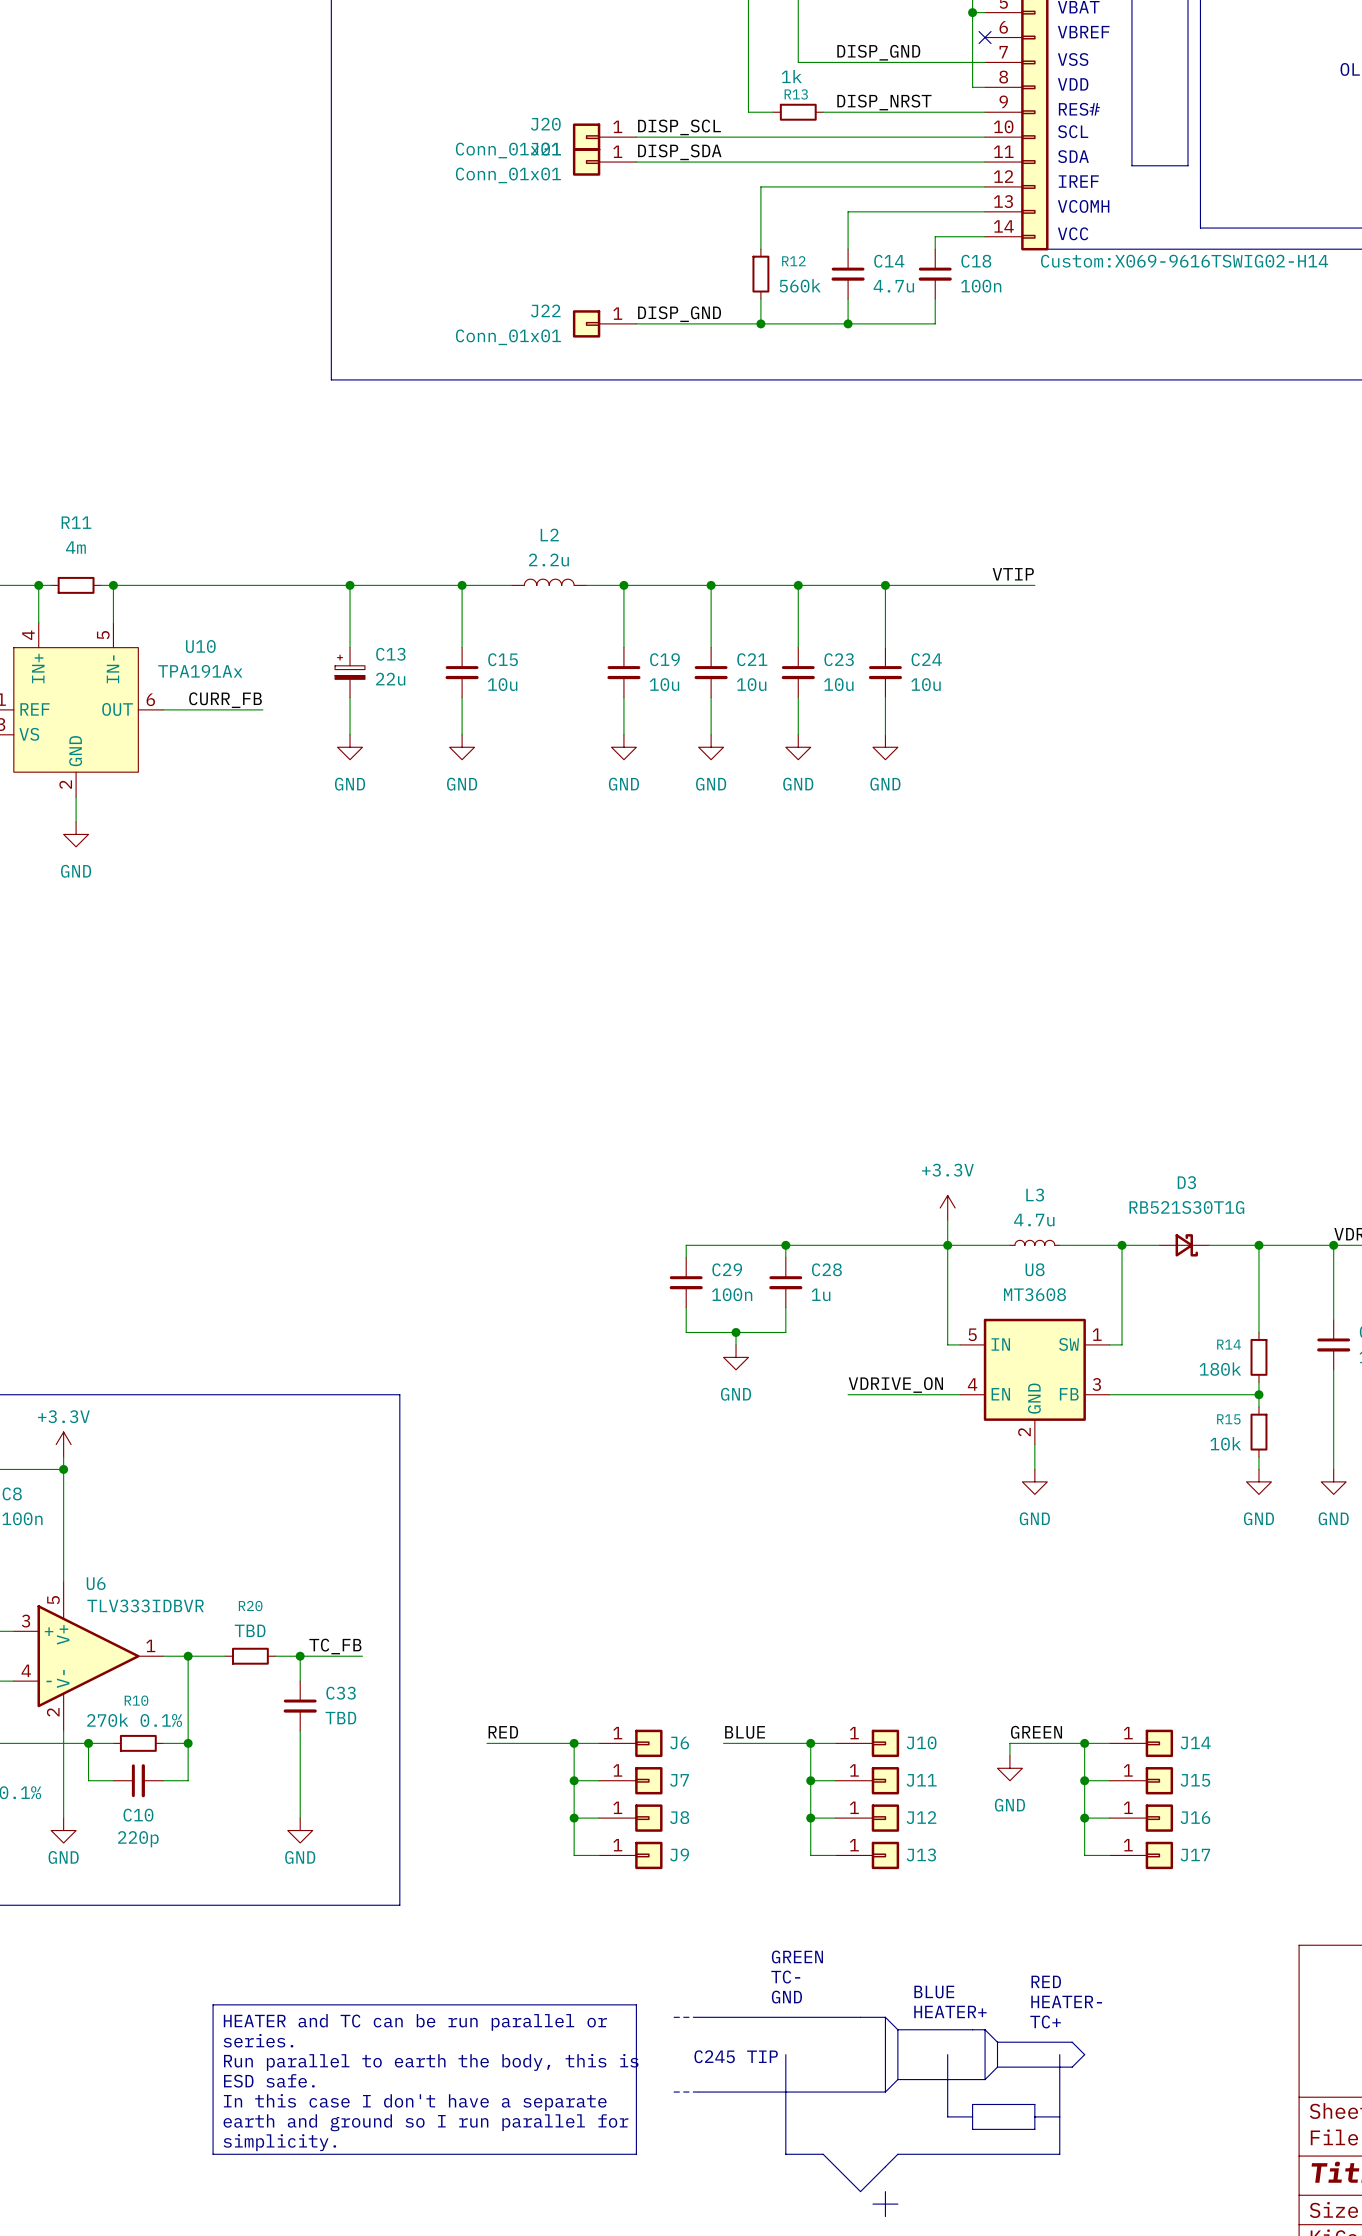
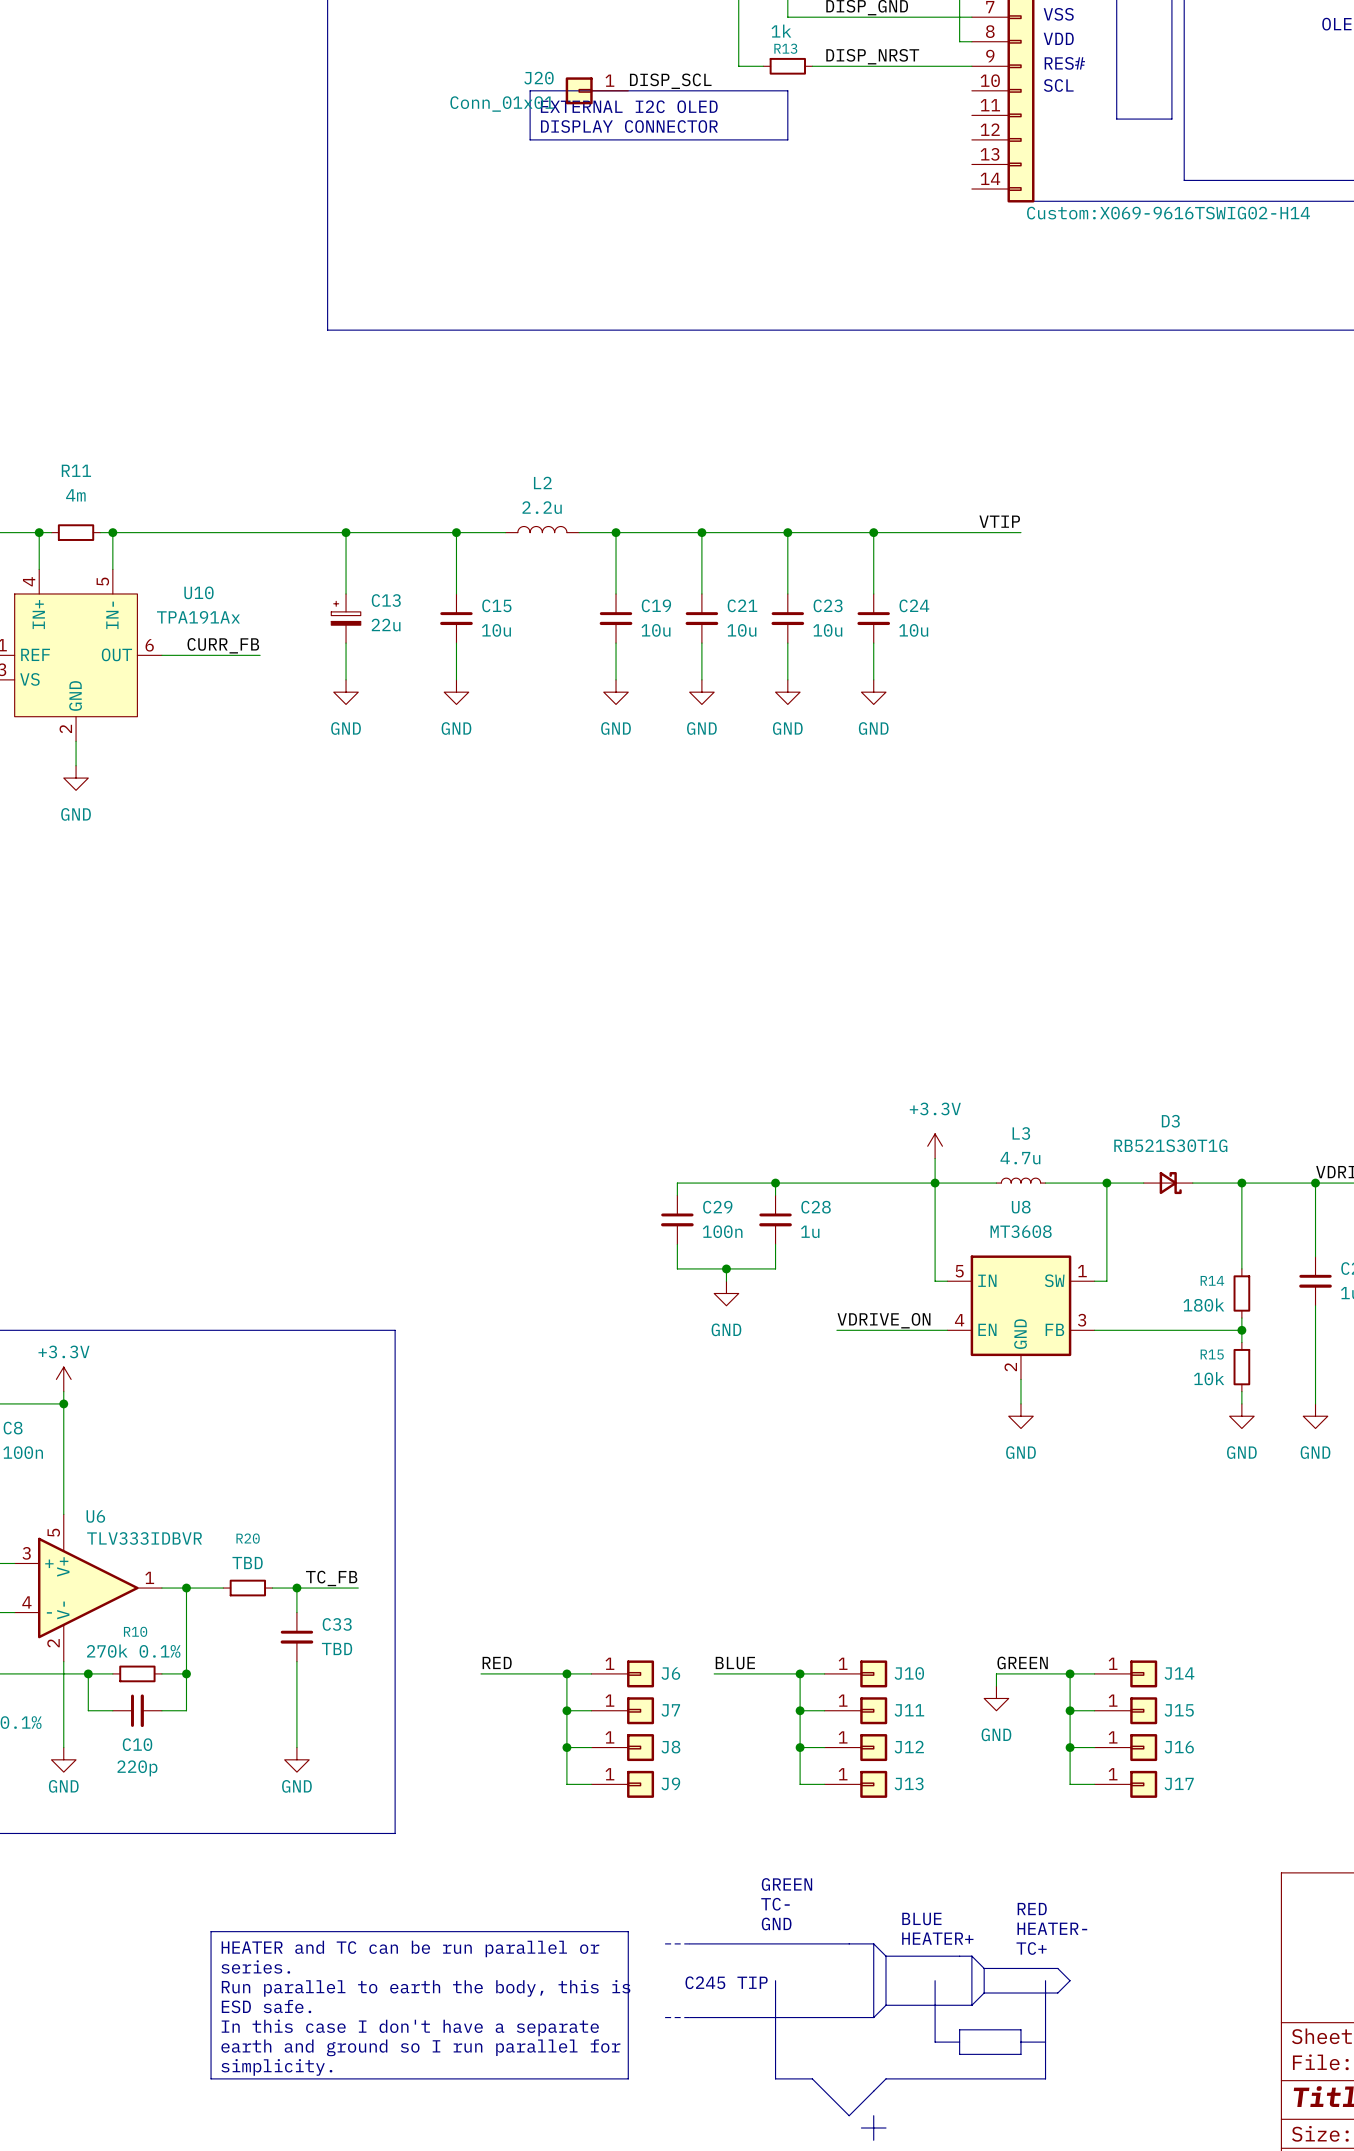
line: none -> (530, 90) (787, 90) (787, 139) (530, 139) (530, 90)
wire: (636, 137) (985, 137) -> none
label: DISP_SDA (679, 152) -> none
text: none -> EXTERNAL I2C OLED (629, 106)
text: SDA (1073, 156) -> none
part: Conn_01x01 (604, 162) -> none
wire: (636, 162) (985, 162) -> none
text: none -> DISPLAY CONNECTOR (629, 126)
text: IREF (1078, 181) -> none
wire: (985, 186) (760, 186) (760, 249) -> none
text: VCOMH (1083, 206) -> none
wire: (985, 211) (848, 211) (848, 249) -> none
text: VCC (1073, 233) -> none
wire: (985, 236) (935, 236) (935, 249) -> none
R12: 560k (760, 274) -> none
C14: 4.7u (848, 274) -> none
C18: 100n (935, 274) -> none
wire: (760, 299) (760, 323) -> none
wire: (848, 299) (848, 323) -> none
wire: (935, 299) (935, 323) (636, 323) -> none
label: DISP_GND (679, 314) -> none
J22: Conn_01x01 (604, 323) -> none
junction: (760, 323) -> none
junction: (848, 323) -> none

